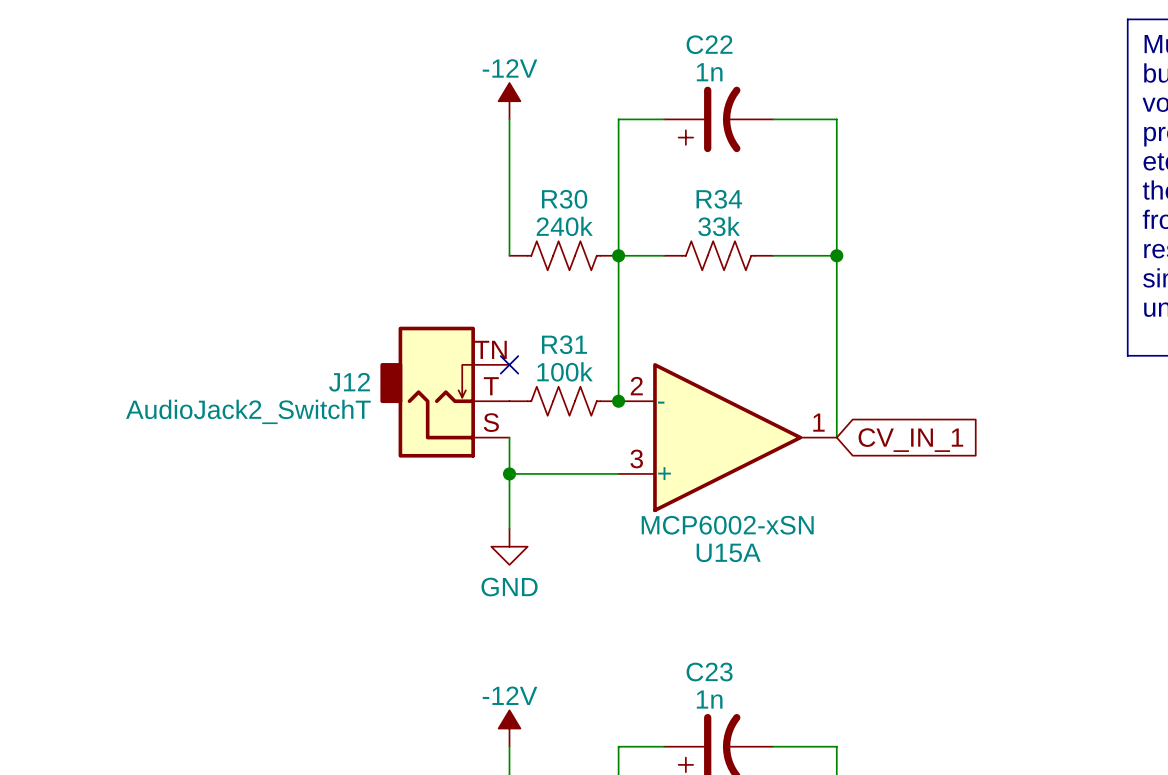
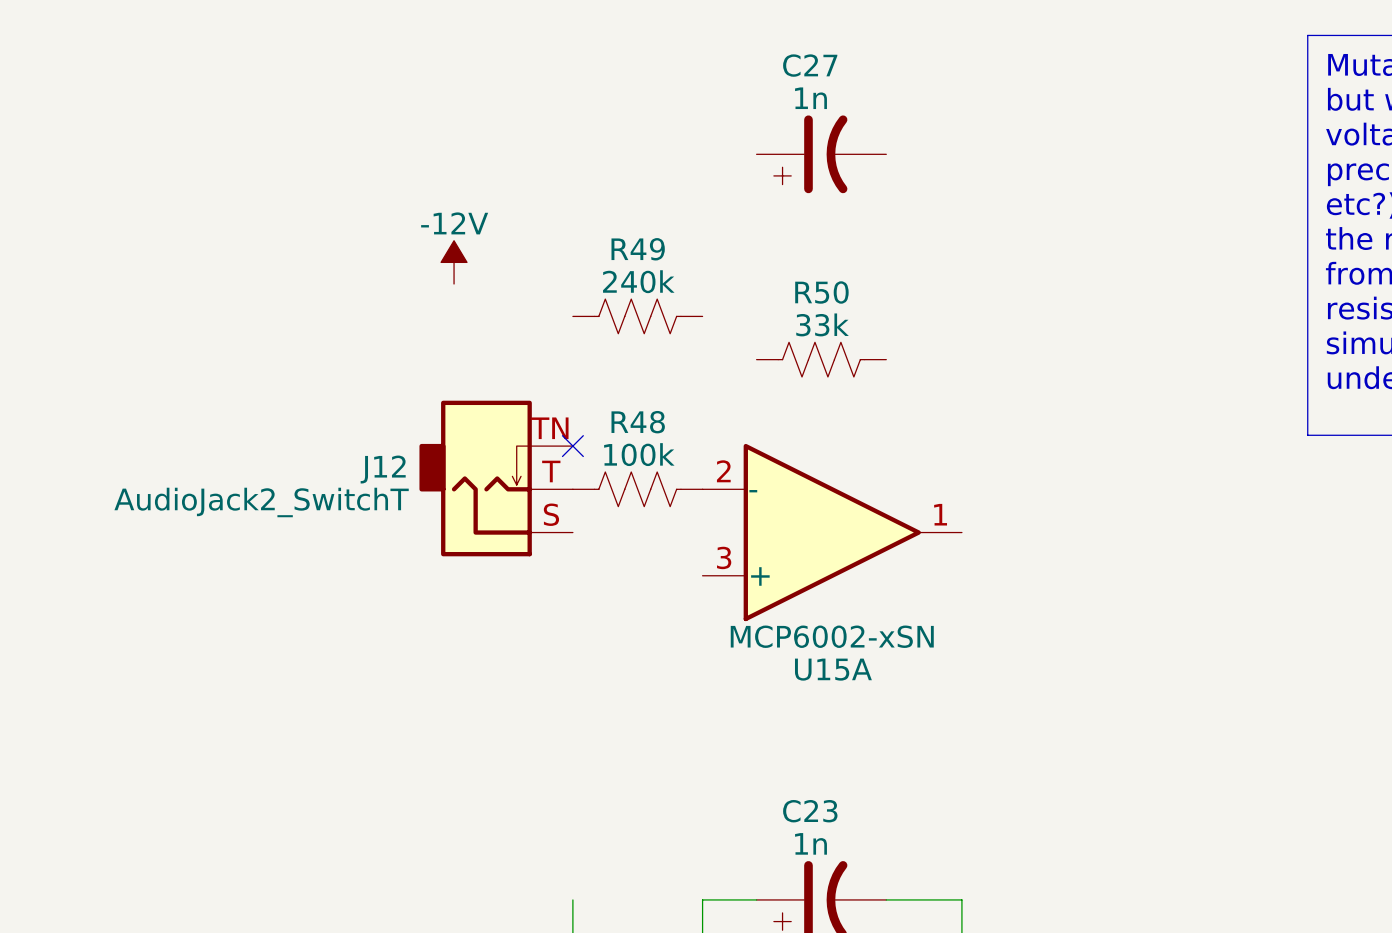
C22 name: C22 (709, 44) -> C27 (810, 65)
power symbol position: -12V (509, 101) -> -12V (454, 262)
wire: (509, 119) (509, 255) -> none
wire: (664, 119) (618, 119) (618, 401) -> none
wire: (773, 119) (836, 119) (836, 437) -> none
R30 name: R30 (564, 199) -> R49 (638, 249)
wire: (618, 255) (664, 255) -> none
junction: (618, 255) -> none
R34: 33k (718, 255) -> none
wire: (773, 255) (836, 255) -> none
junction: (836, 255) -> none
R50: none -> 33k (821, 359)
R31 name: R31 (564, 344) -> R48 (638, 422)
junction: (618, 401) -> none
wire: (509, 437) (509, 528) -> none
global label: CV_IN_1 (910, 440) -> none
wire: (509, 473) (618, 473) -> none
junction: (509, 473) -> none
power symbol: GND (509, 546) -> none
power symbol: -12V (509, 728) -> none

